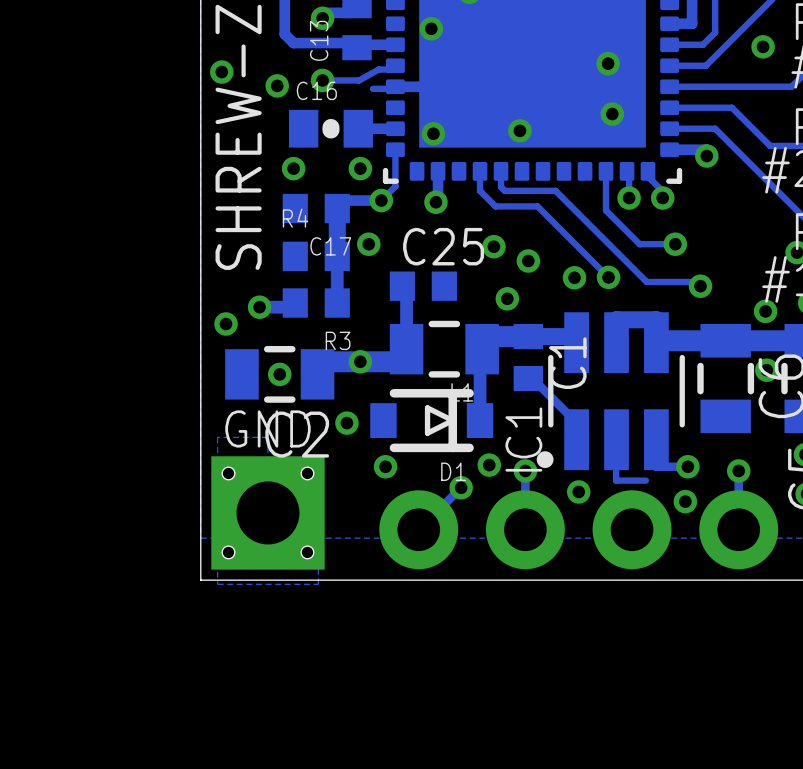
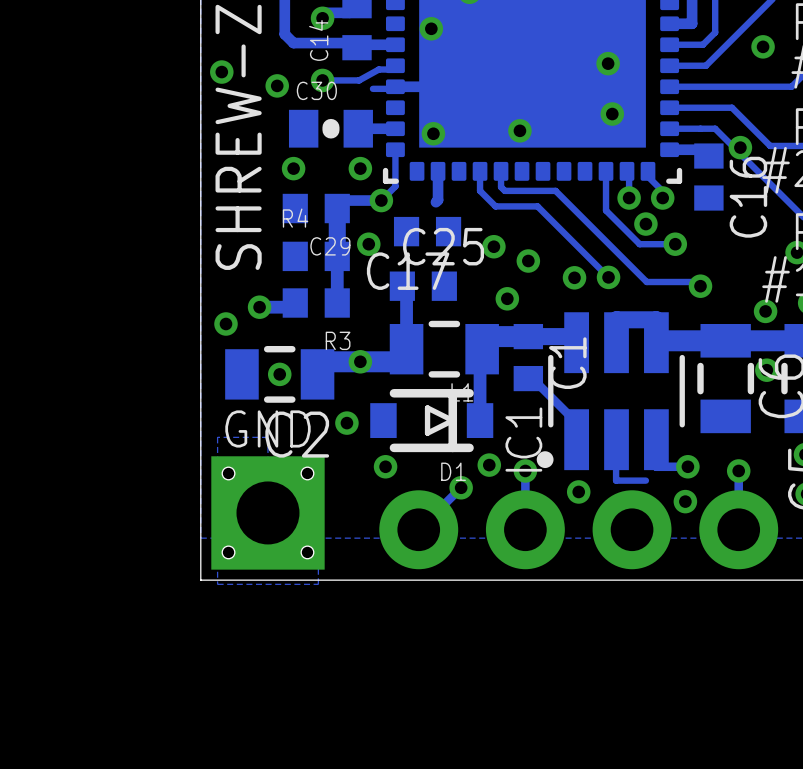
C13 name: C13 (319, 40) -> C14 (318, 40)
C16 name: C16 (316, 90) -> C30 (316, 90)
via position: (706, 156) -> (740, 147)
C16: none -> (708, 177)
via: (435, 202) -> none
via: none -> (645, 224)
C17: none -> (427, 231)
C17 name: C17 (330, 246) -> C29 (330, 246)

